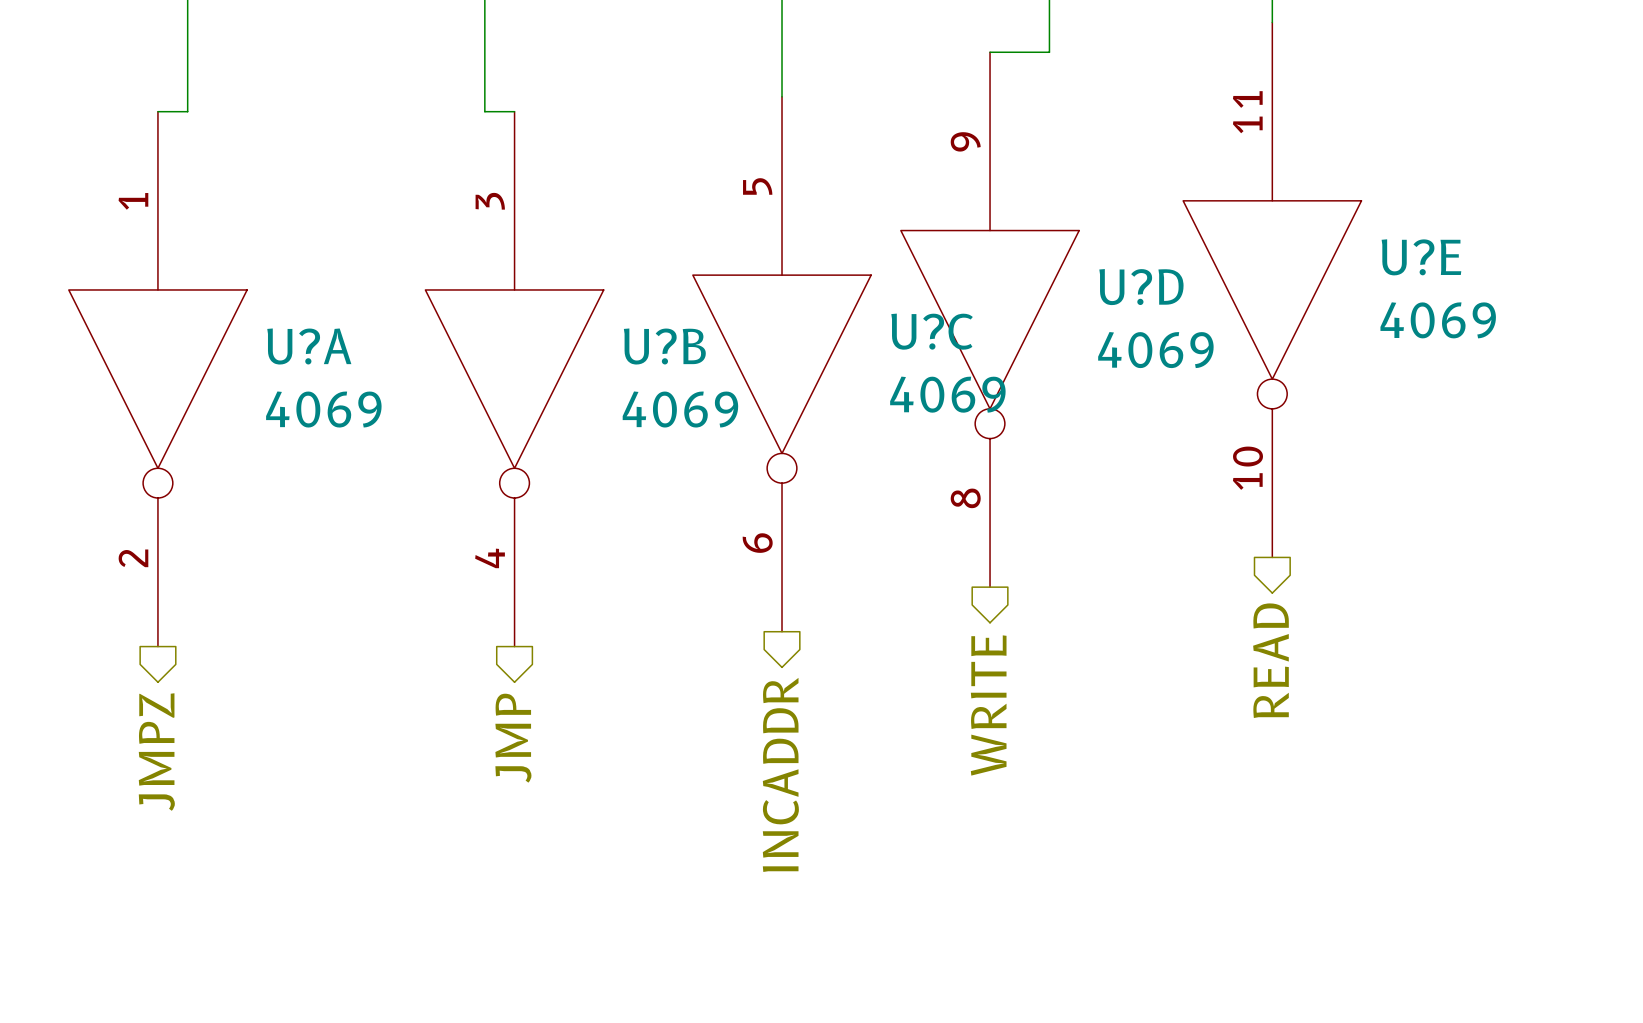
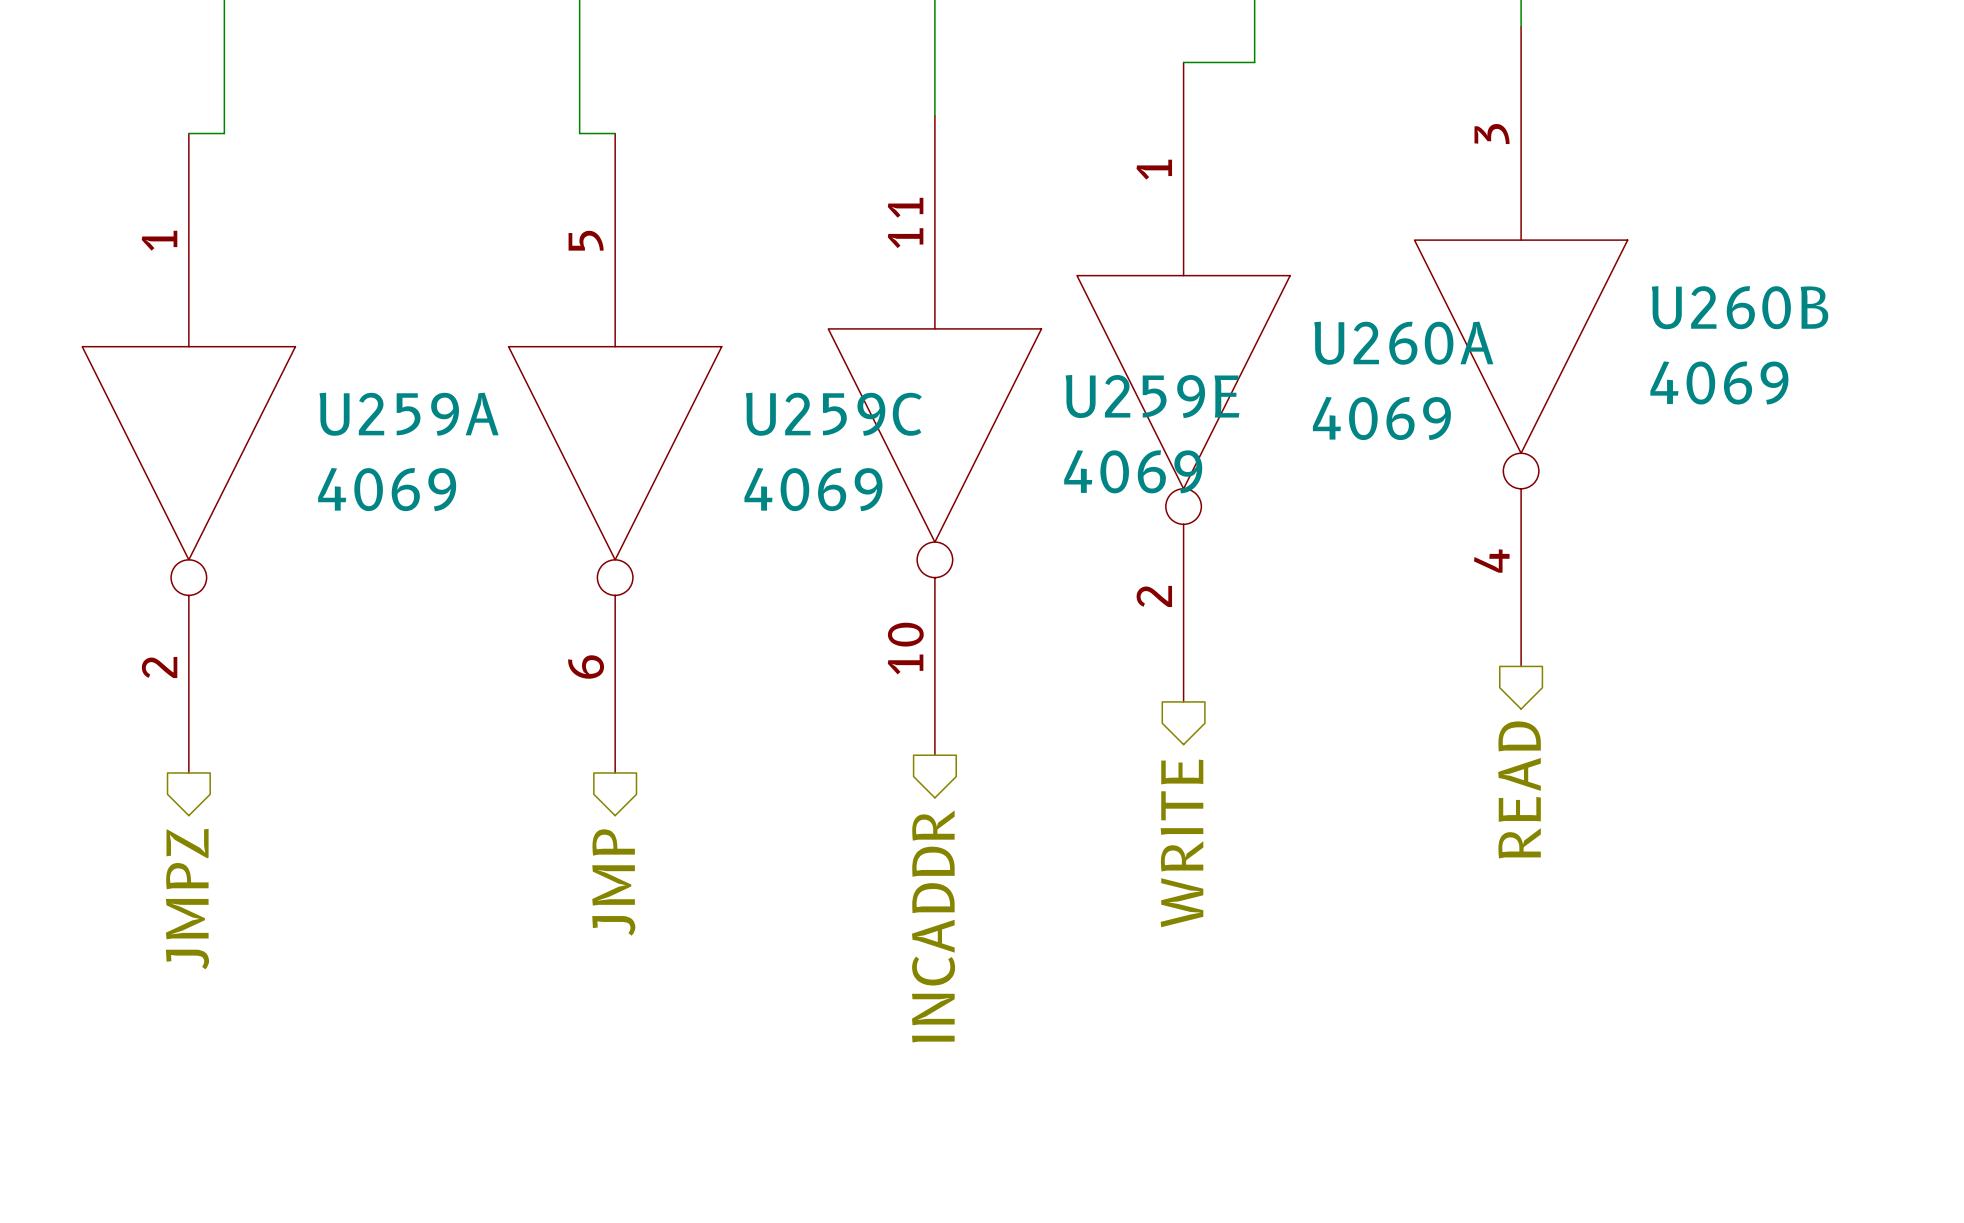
U?E pin number: 11 (1247, 112) -> 3 (1492, 134)
U?D pin number: 9 (965, 141) -> 1 (1154, 169)
U?C pin number: 5 (757, 186) -> 11 (905, 222)
U?B pin number: 3 (490, 201) -> 5 (586, 240)
U?E name: U?E (1421, 257) -> U260B (1740, 307)
U?D name: U?D (1141, 287) -> U260A (1403, 343)
U?C name: U?C (932, 331) -> U259E (1152, 396)
U?A name: U?A (309, 346) -> U259A (409, 414)
U?B name: U?B (664, 346) -> U259C (833, 414)
U?E pin number: 10 (1247, 468) -> 4 (1491, 561)
U?D pin number: 8 (965, 498) -> 2 (1154, 596)
U?C pin number: 6 (757, 543) -> 10 (905, 648)
U?B pin number: 4 (490, 558) -> 6 (586, 667)

